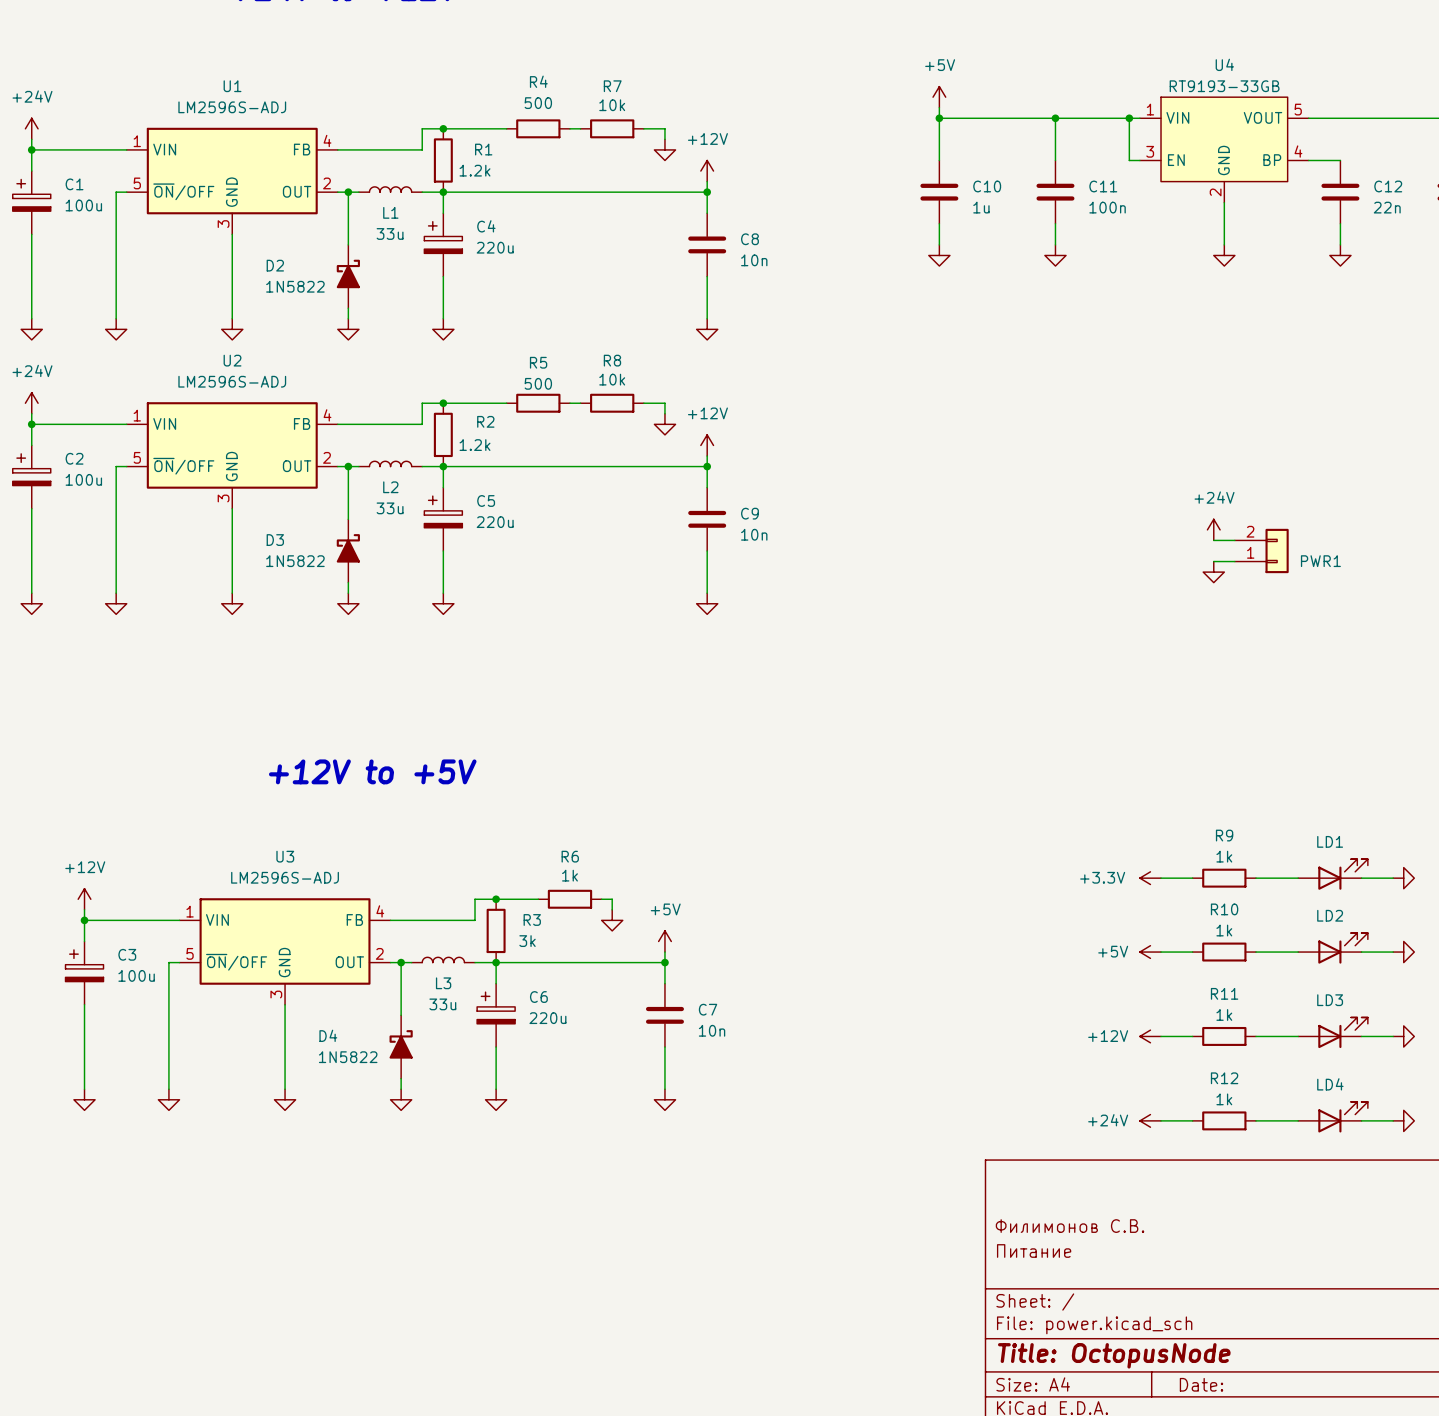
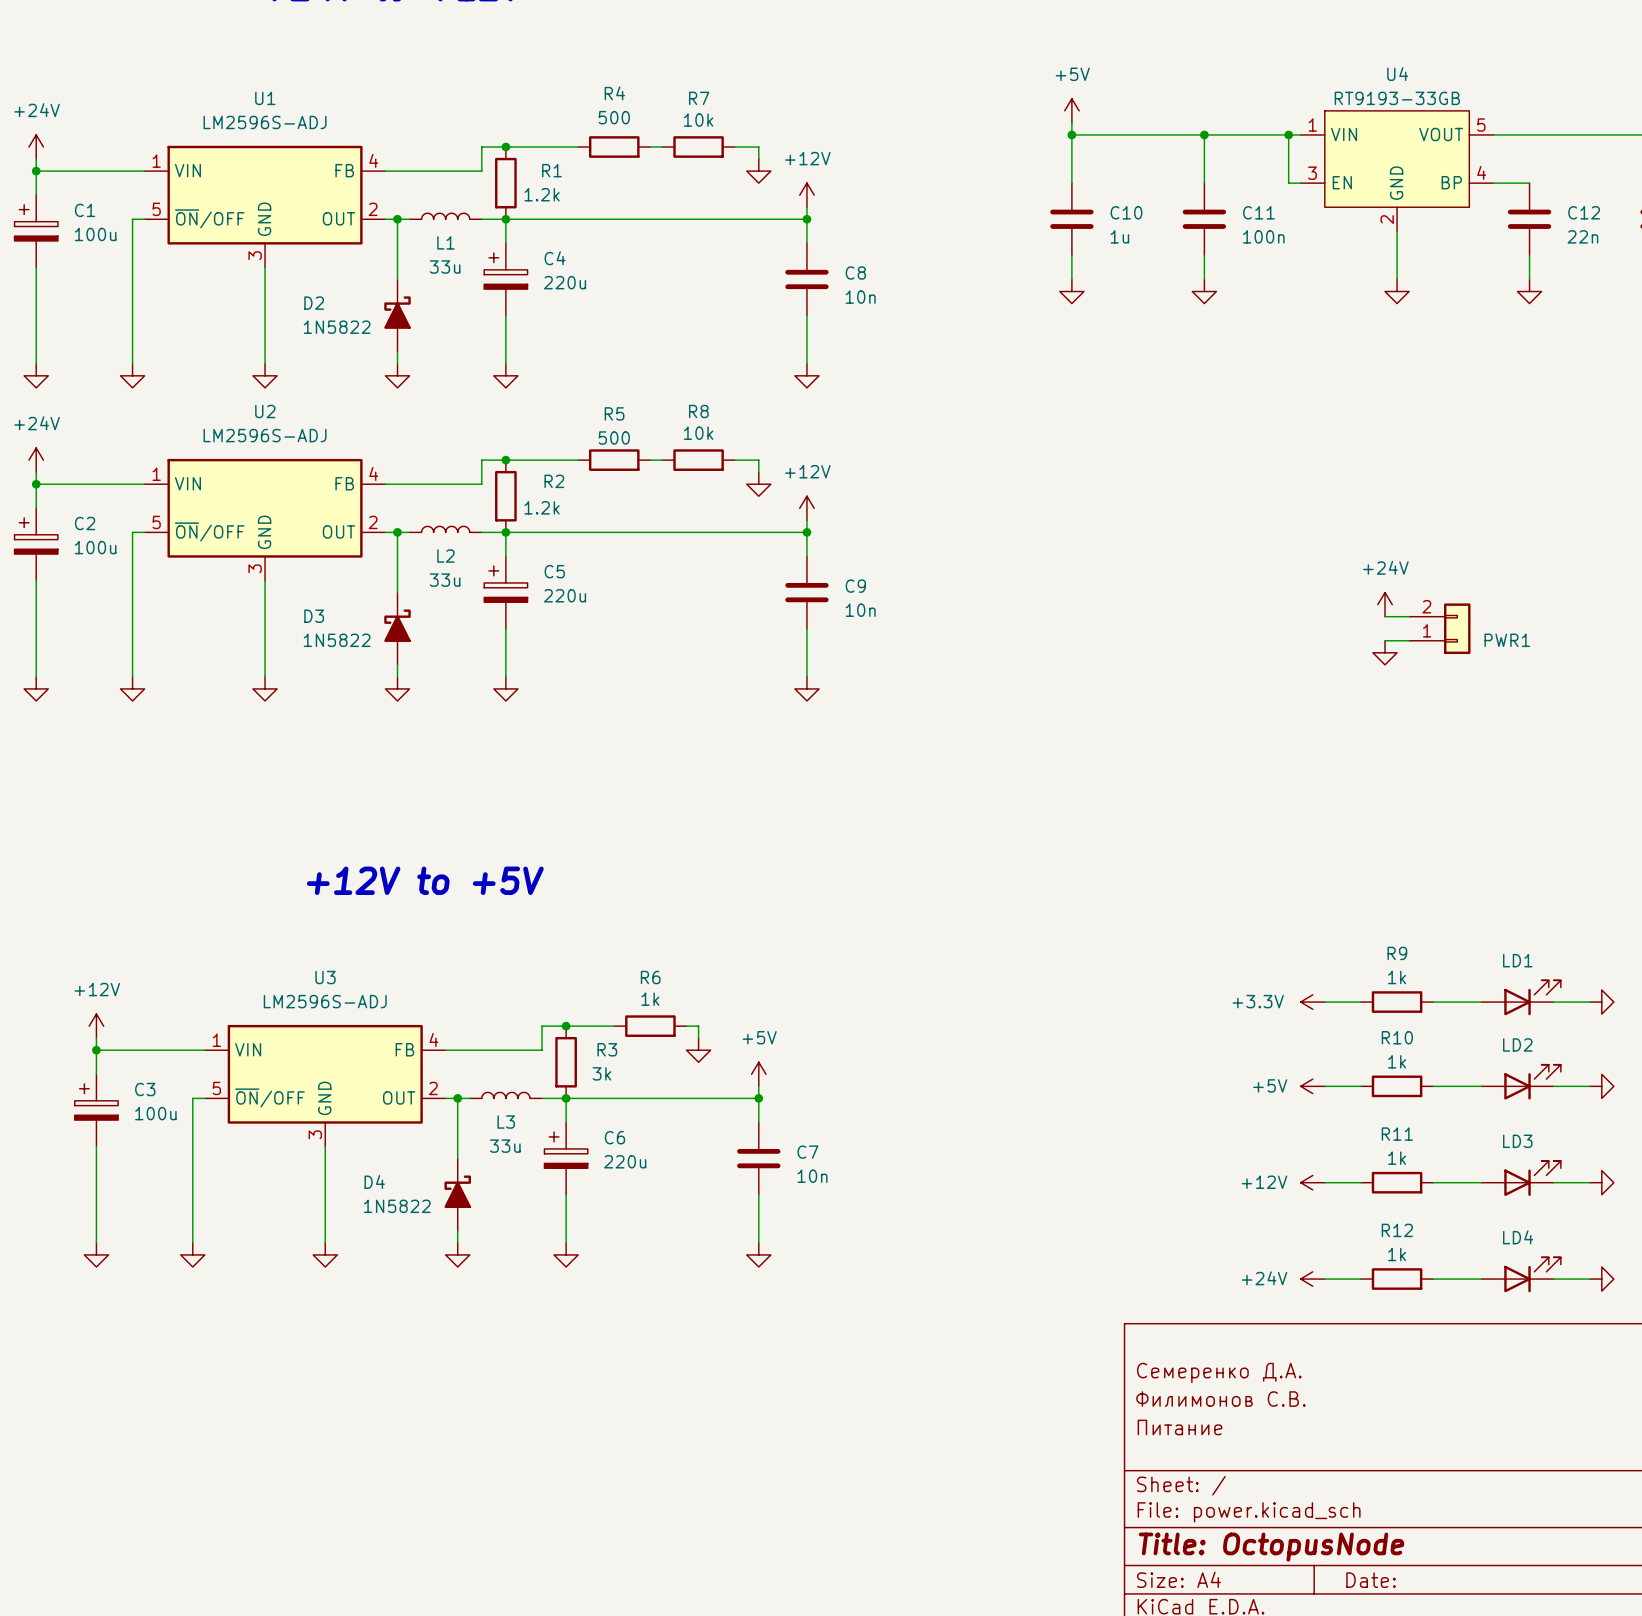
title block: none -> Семеренко Д.А. (1219, 1372)

